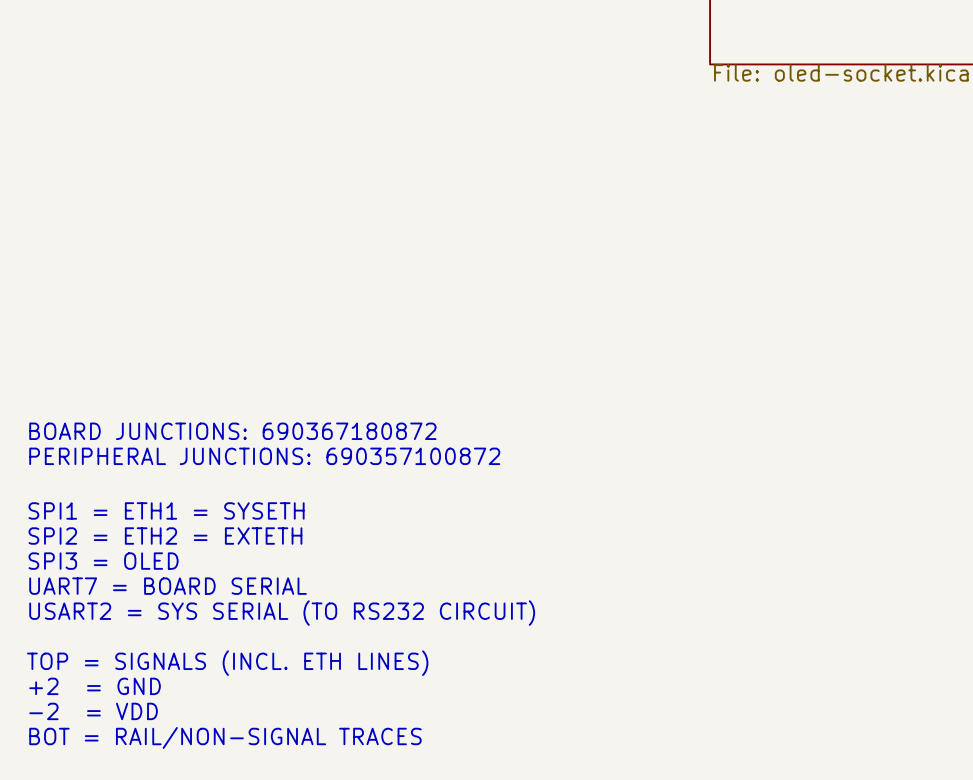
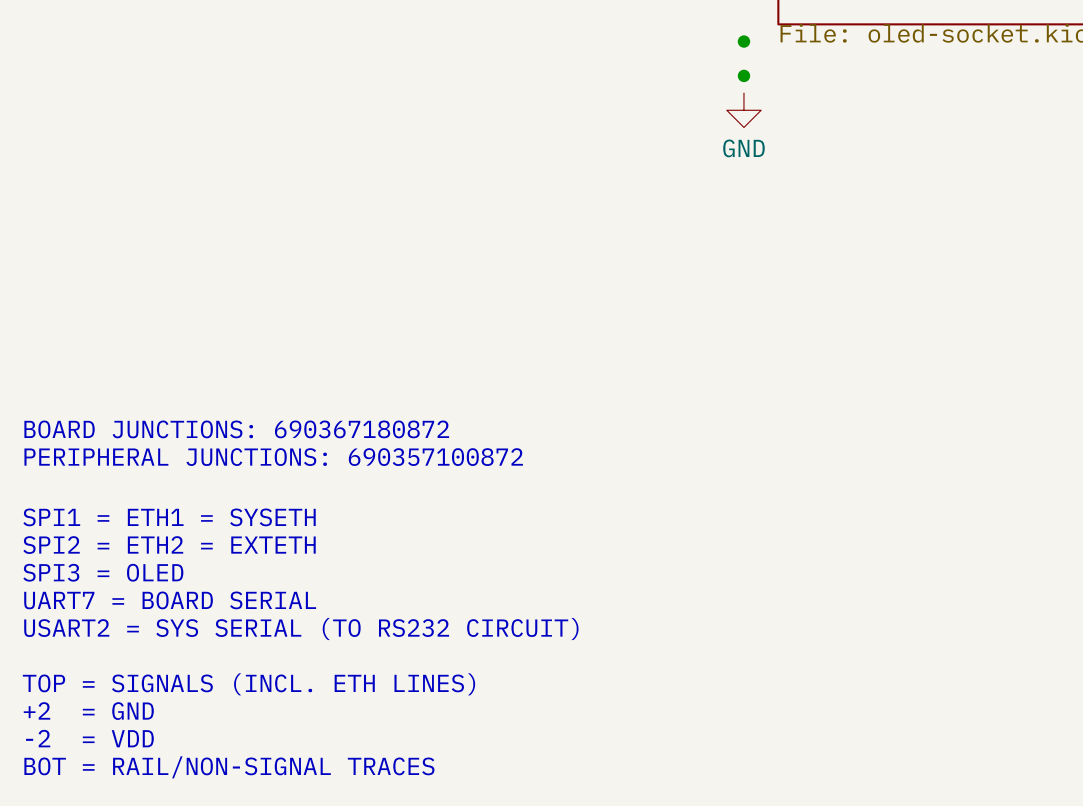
junction: none -> (743, 41)
junction: none -> (743, 75)
power symbol: none -> GND (743, 110)

